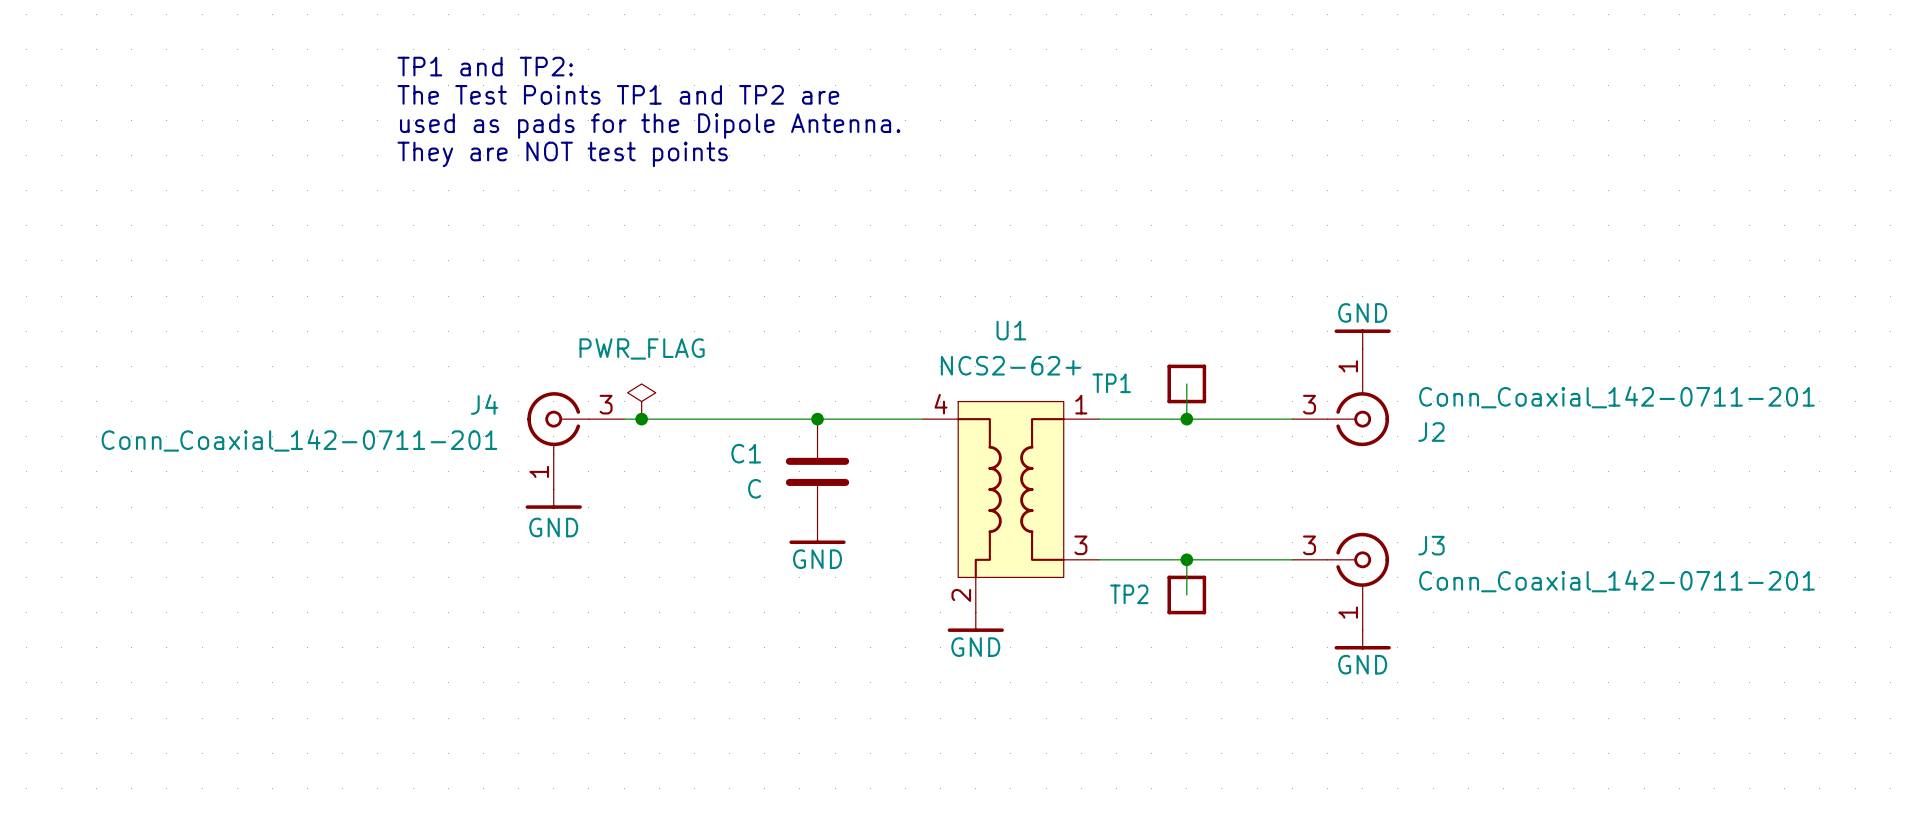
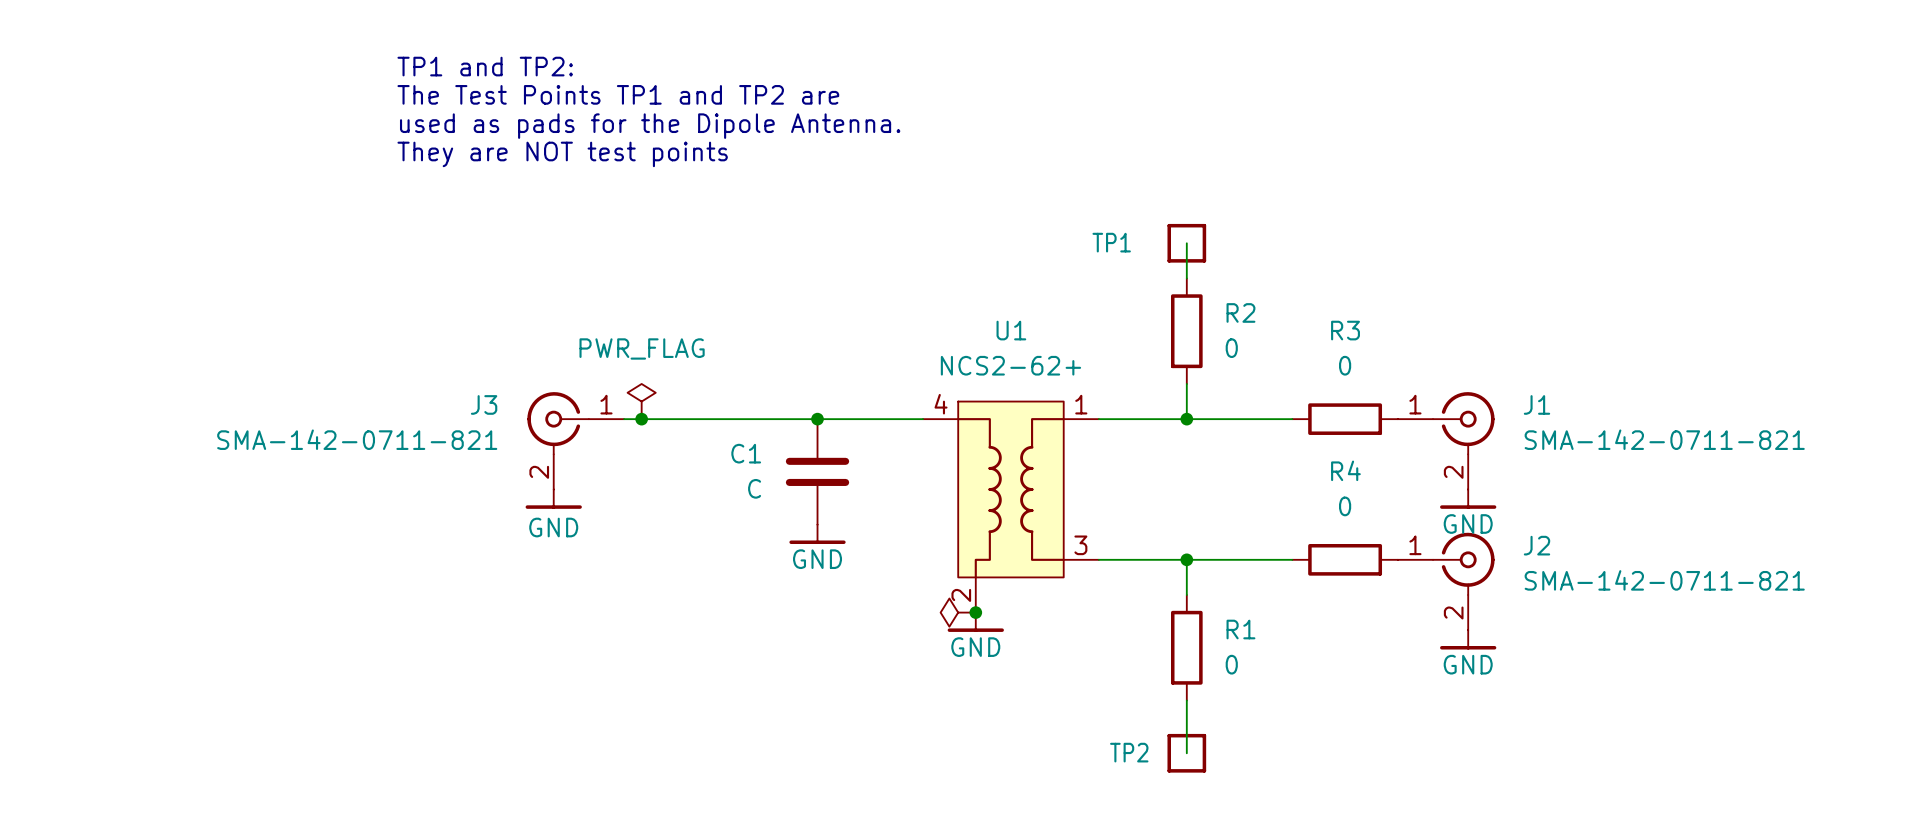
wire: none -> (1186, 243) (1186, 278)
R2: none -> 0 (1186, 331)
power symbol: GND (1362, 339) -> none
J2 symbol: [1292, 348, 1390, 447] -> [1397, 532, 1495, 631]
TP1 position: (1186, 383) -> (1186, 243)
J2 value: Conn_Coaxial_142-0711-201 (1616, 397) -> SMA-142-0711-821 (1664, 580)
R3: none -> 0 (1345, 419)
J2 name position: J2 (1431, 432) -> J2 (1536, 545)
J4: Conn_Coaxial_142-0711-201 (575, 440) -> none
J1: none -> SMA-142-0711-821 (1446, 440)
power symbol: none -> GND (1468, 499)
J3 symbol: [1292, 532, 1390, 631] -> [527, 392, 625, 490]
J3 name position: J3 (1431, 545) -> J3 (484, 404)
R4: none -> 0 (1345, 559)
J3 value: Conn_Coaxial_142-0711-201 (1616, 581) -> SMA-142-0711-821 (357, 439)
TP2 position: (1186, 595) -> (1186, 753)
power symbol: none -> (958, 612)
junction: none -> (975, 612)
power symbol: GND (1362, 639) -> none
power symbol: none -> GND (1468, 639)
R1: none -> 0 (1186, 647)
wire: none -> (1186, 700) (1186, 753)

